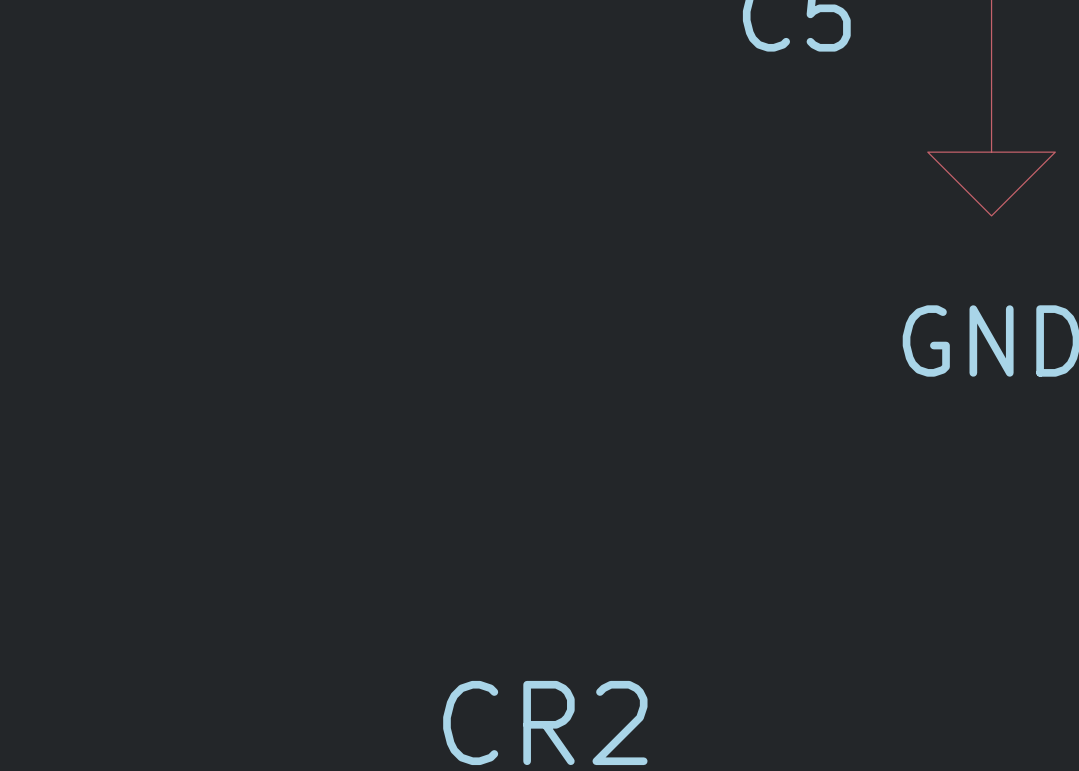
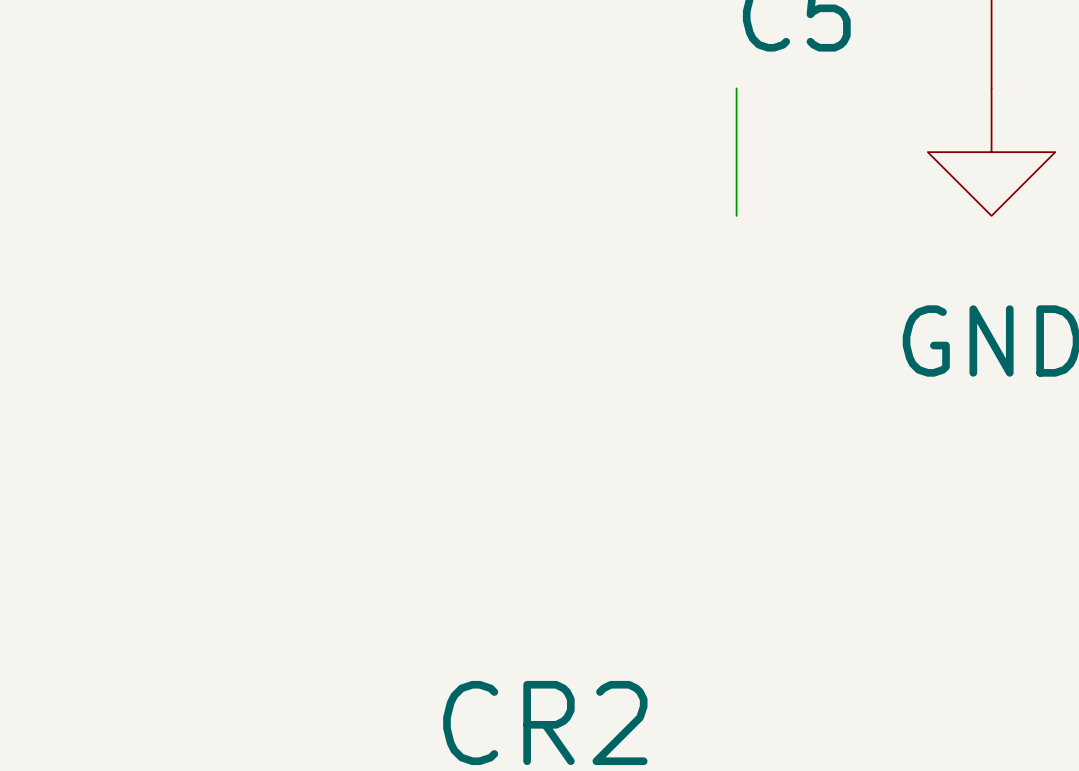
wire: none -> (736, 88) (736, 215)

